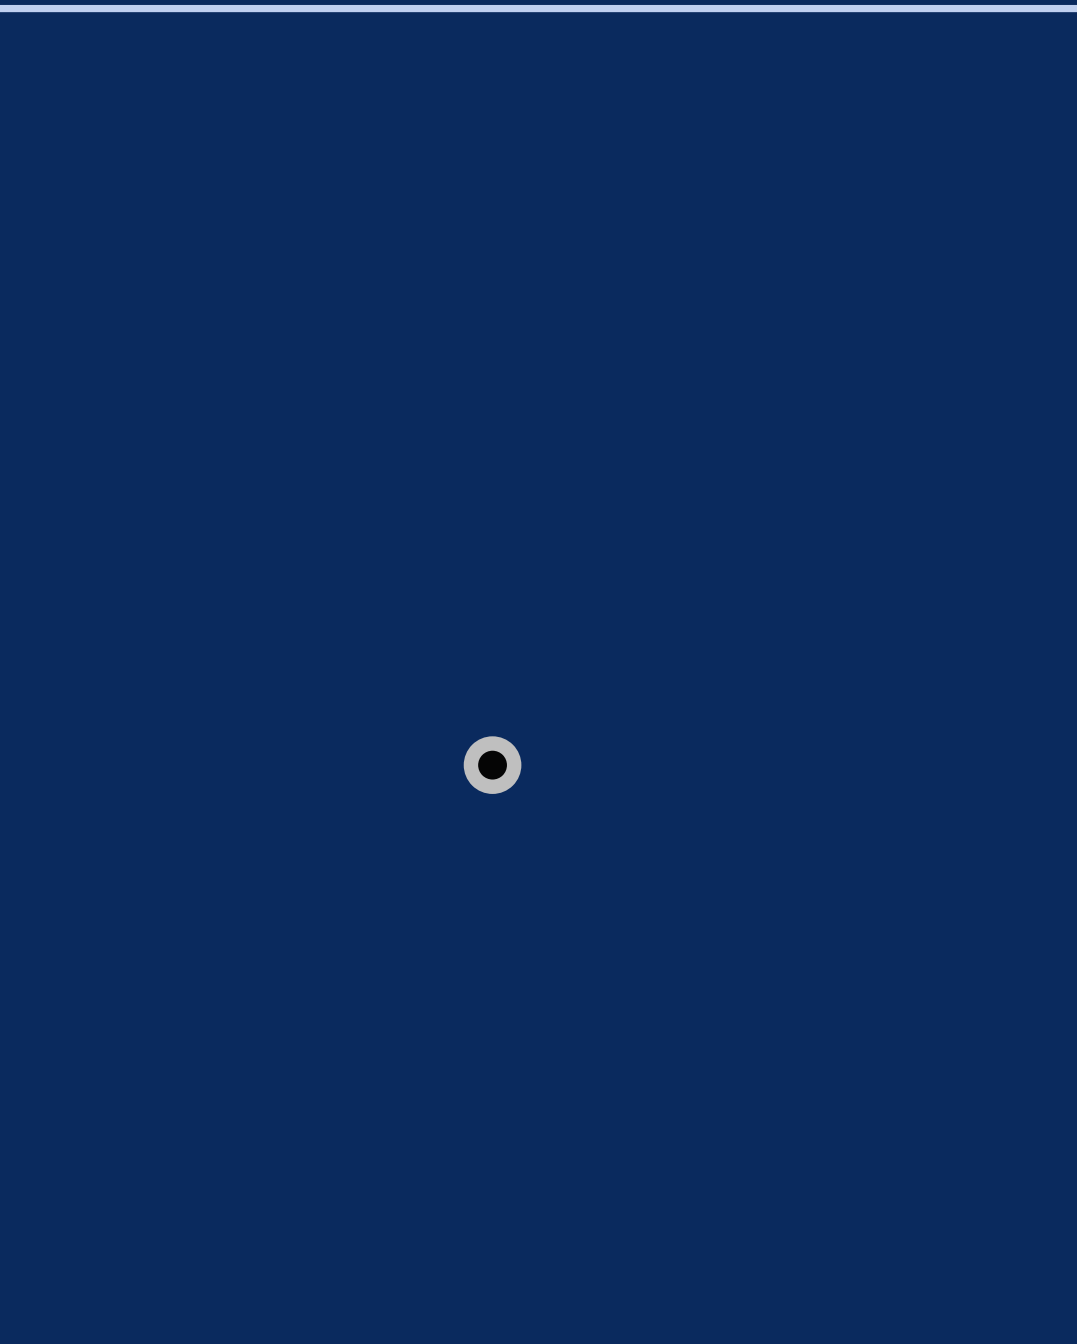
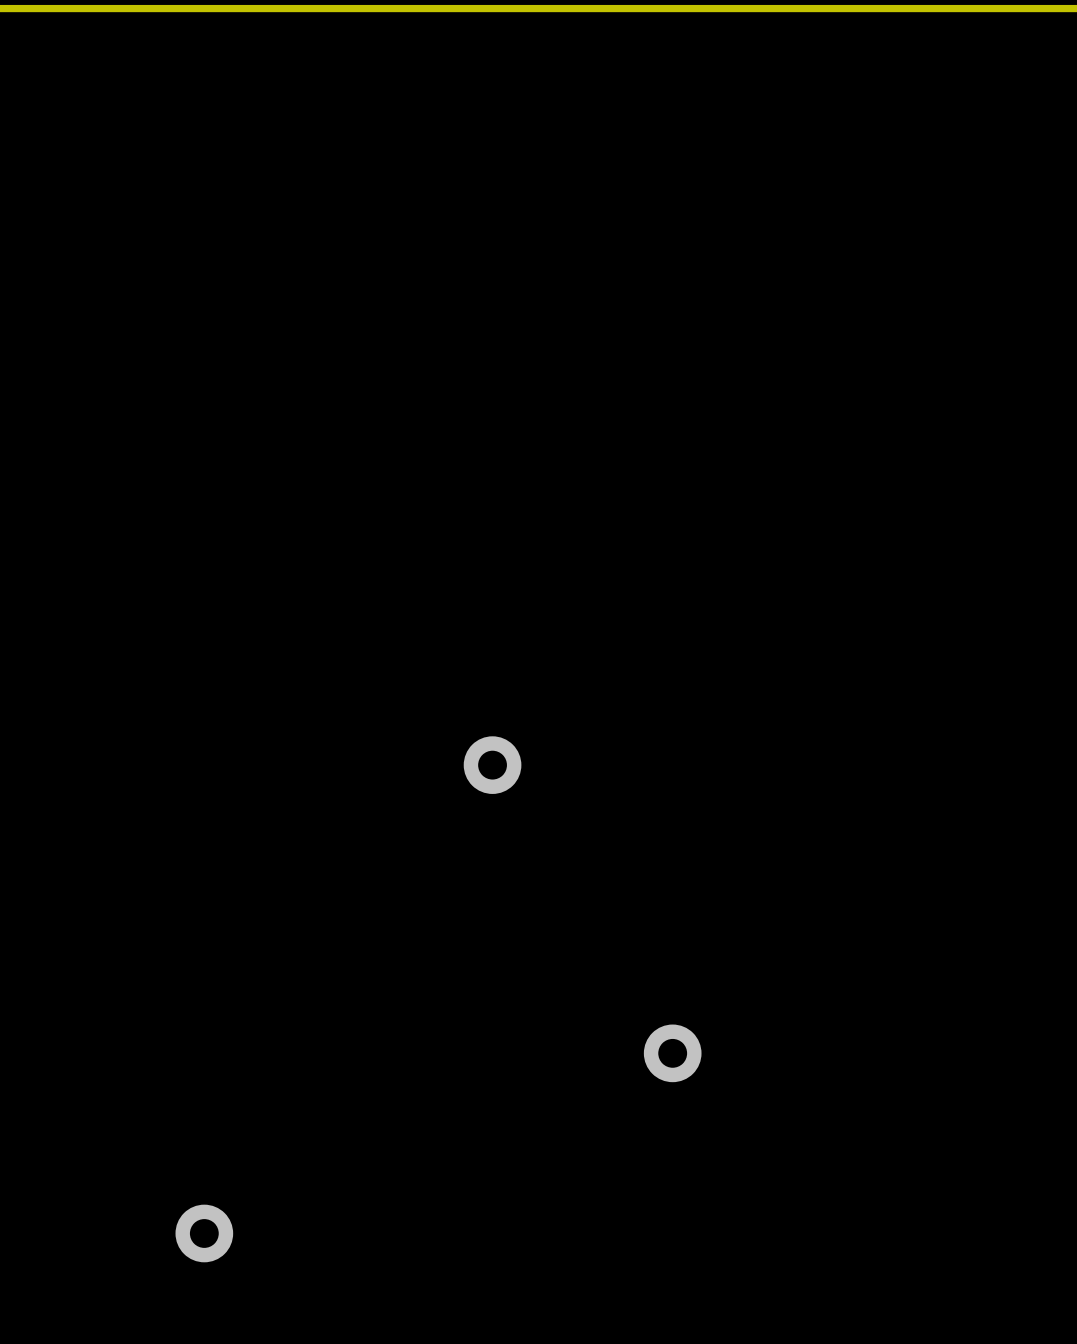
via: none -> (672, 1053)
via: none -> (204, 1233)

